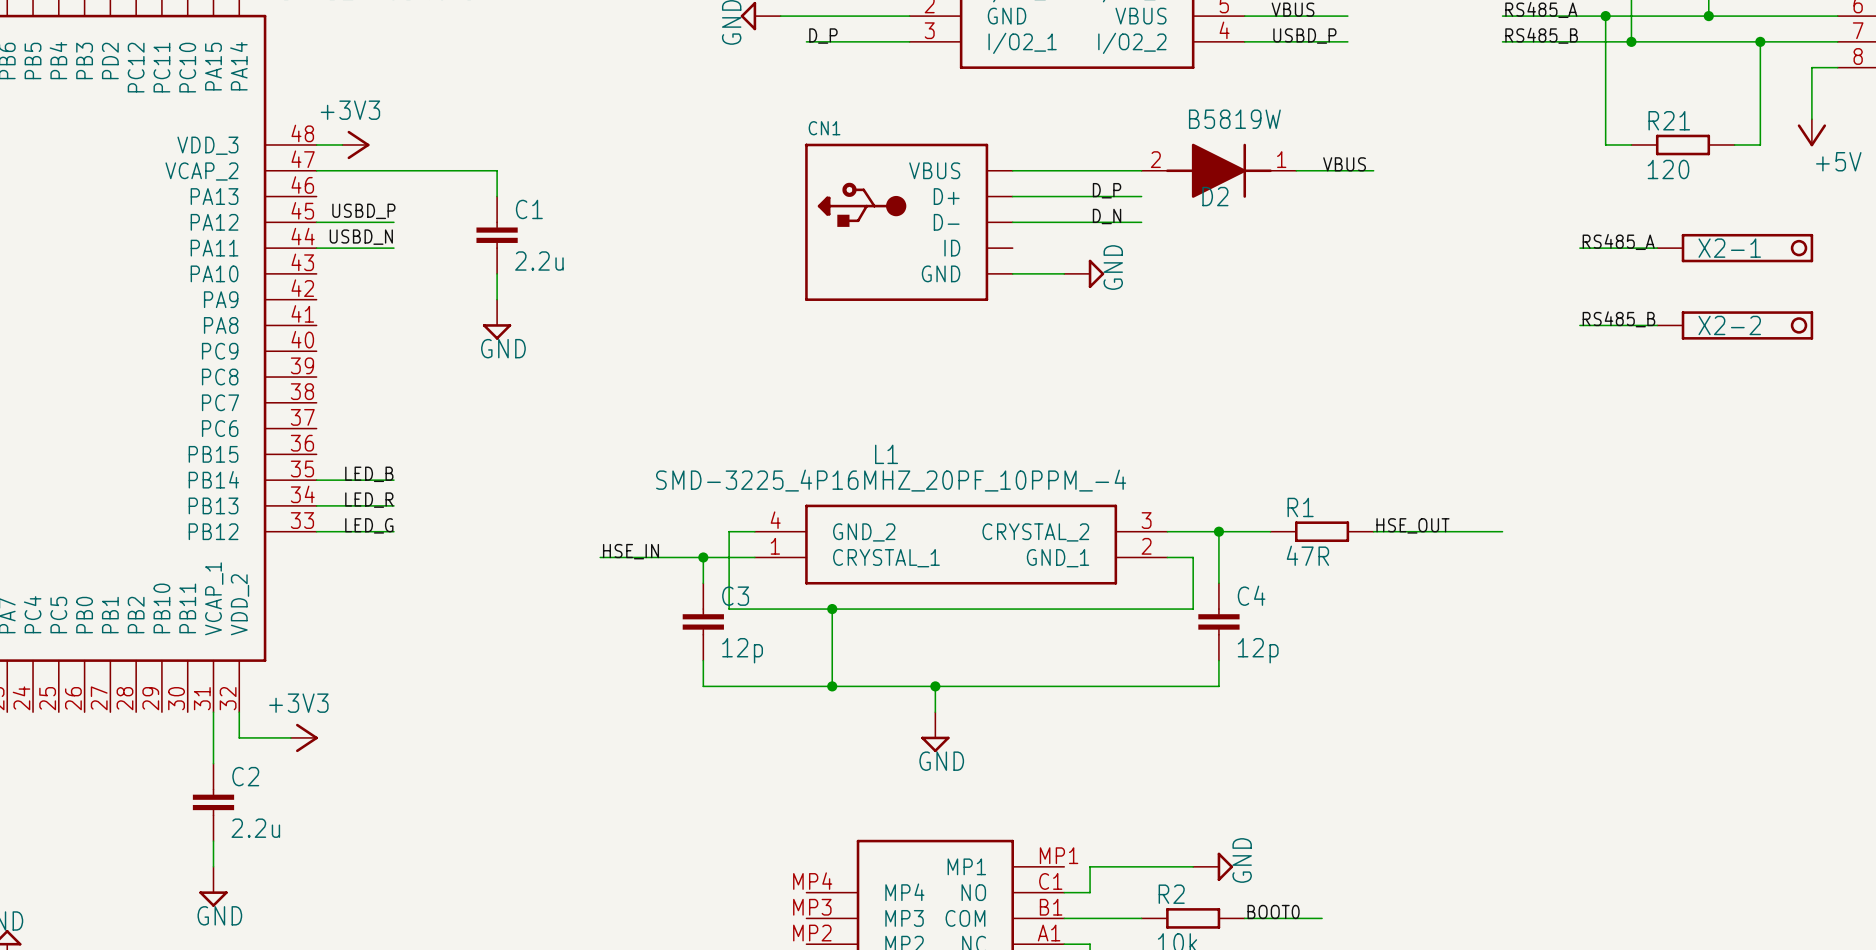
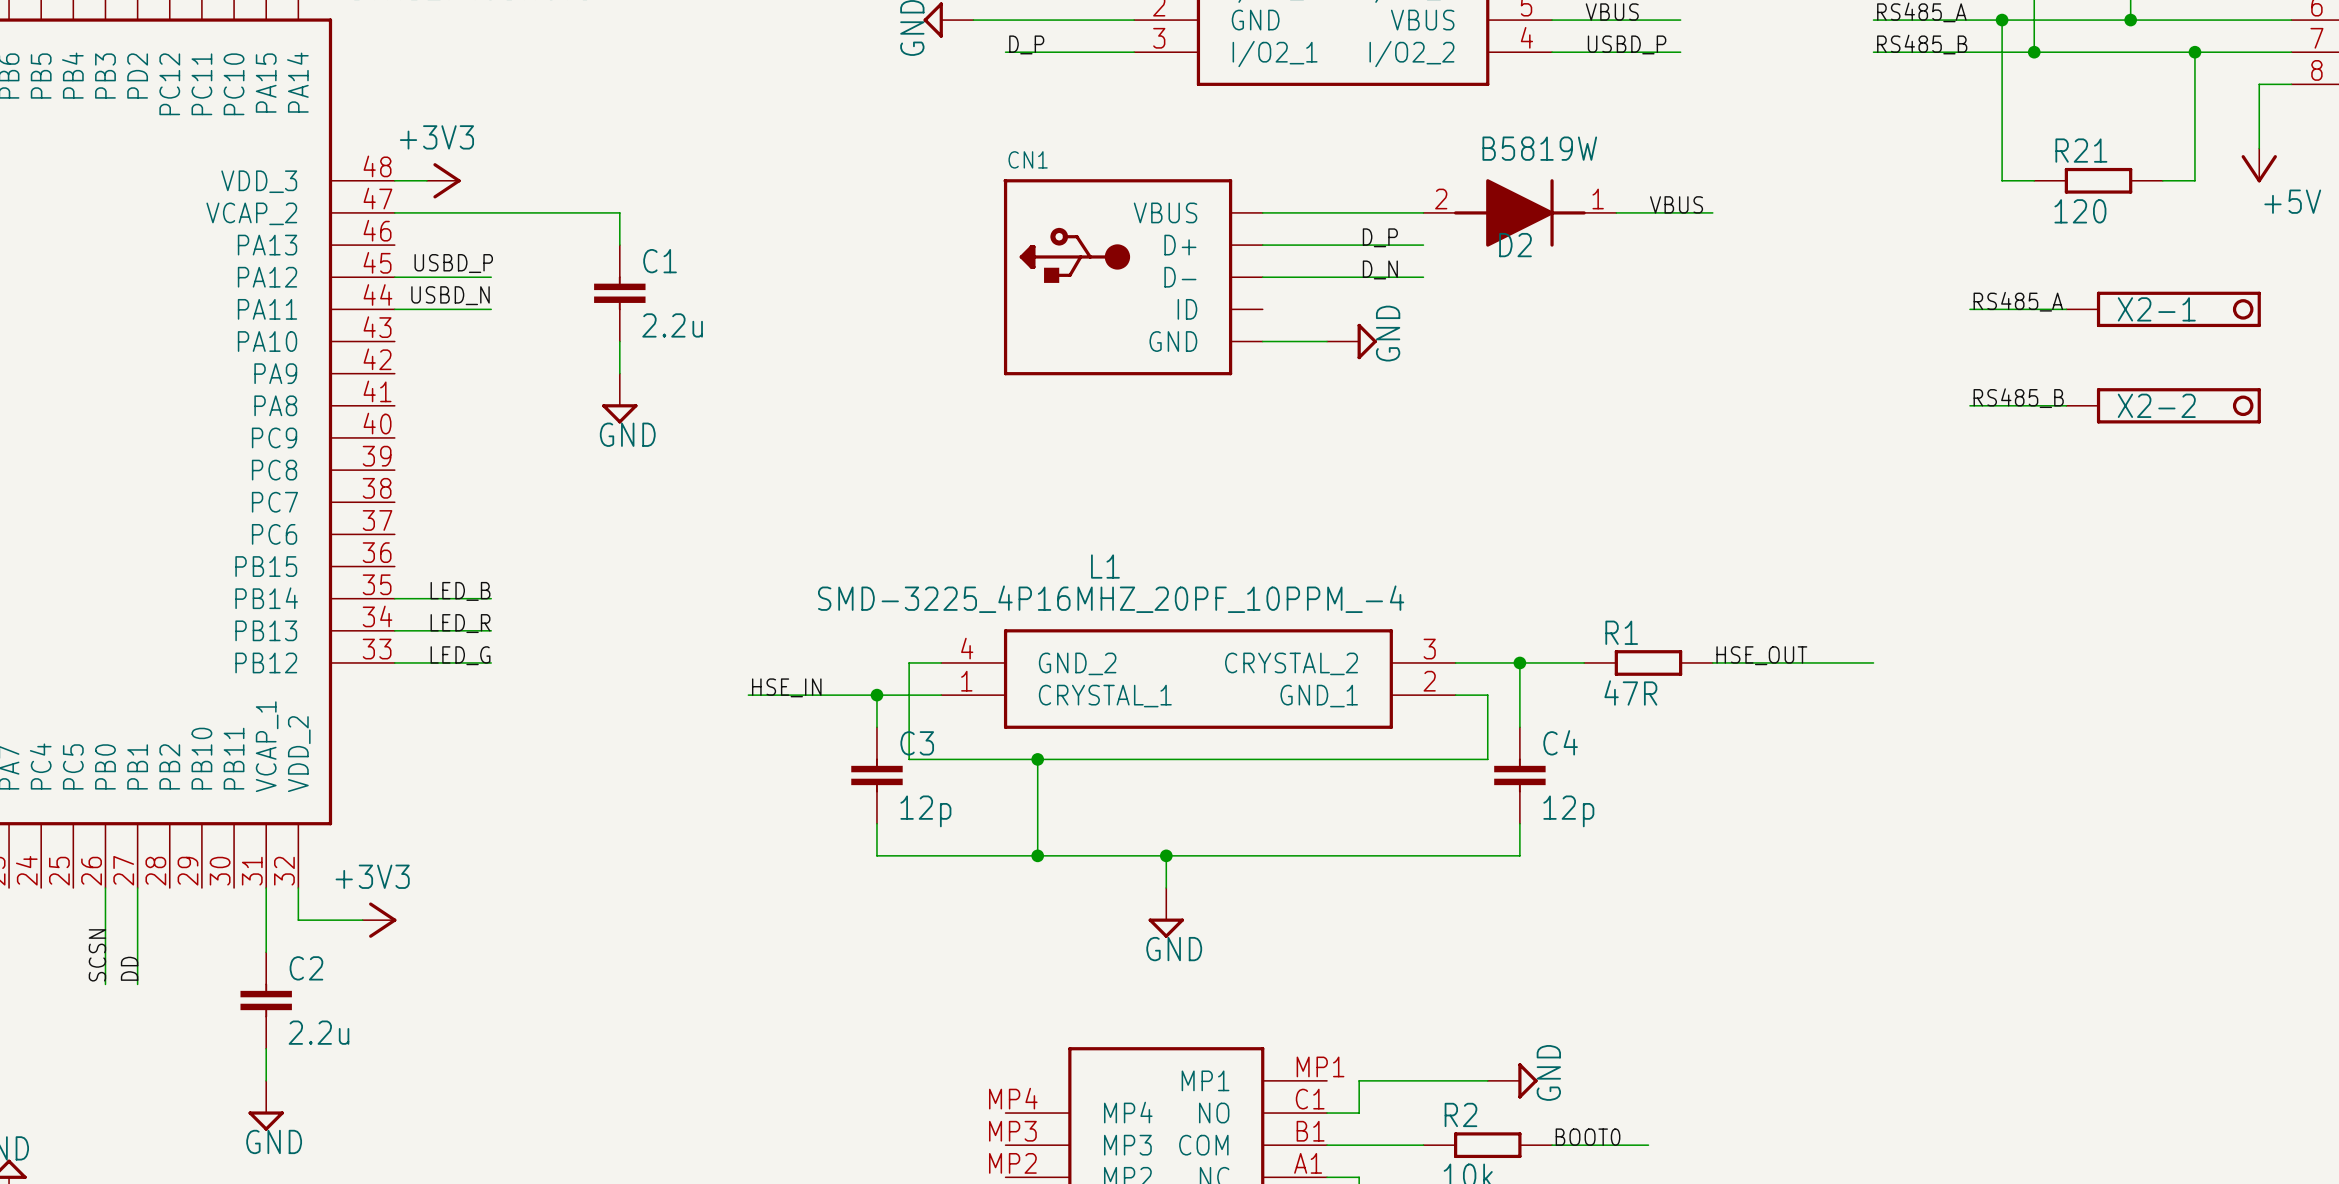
wire: none -> (105, 888) (105, 984)
wire: none -> (137, 888) (137, 984)
label: none -> SCSN (97, 955)
label: none -> DD (129, 968)

